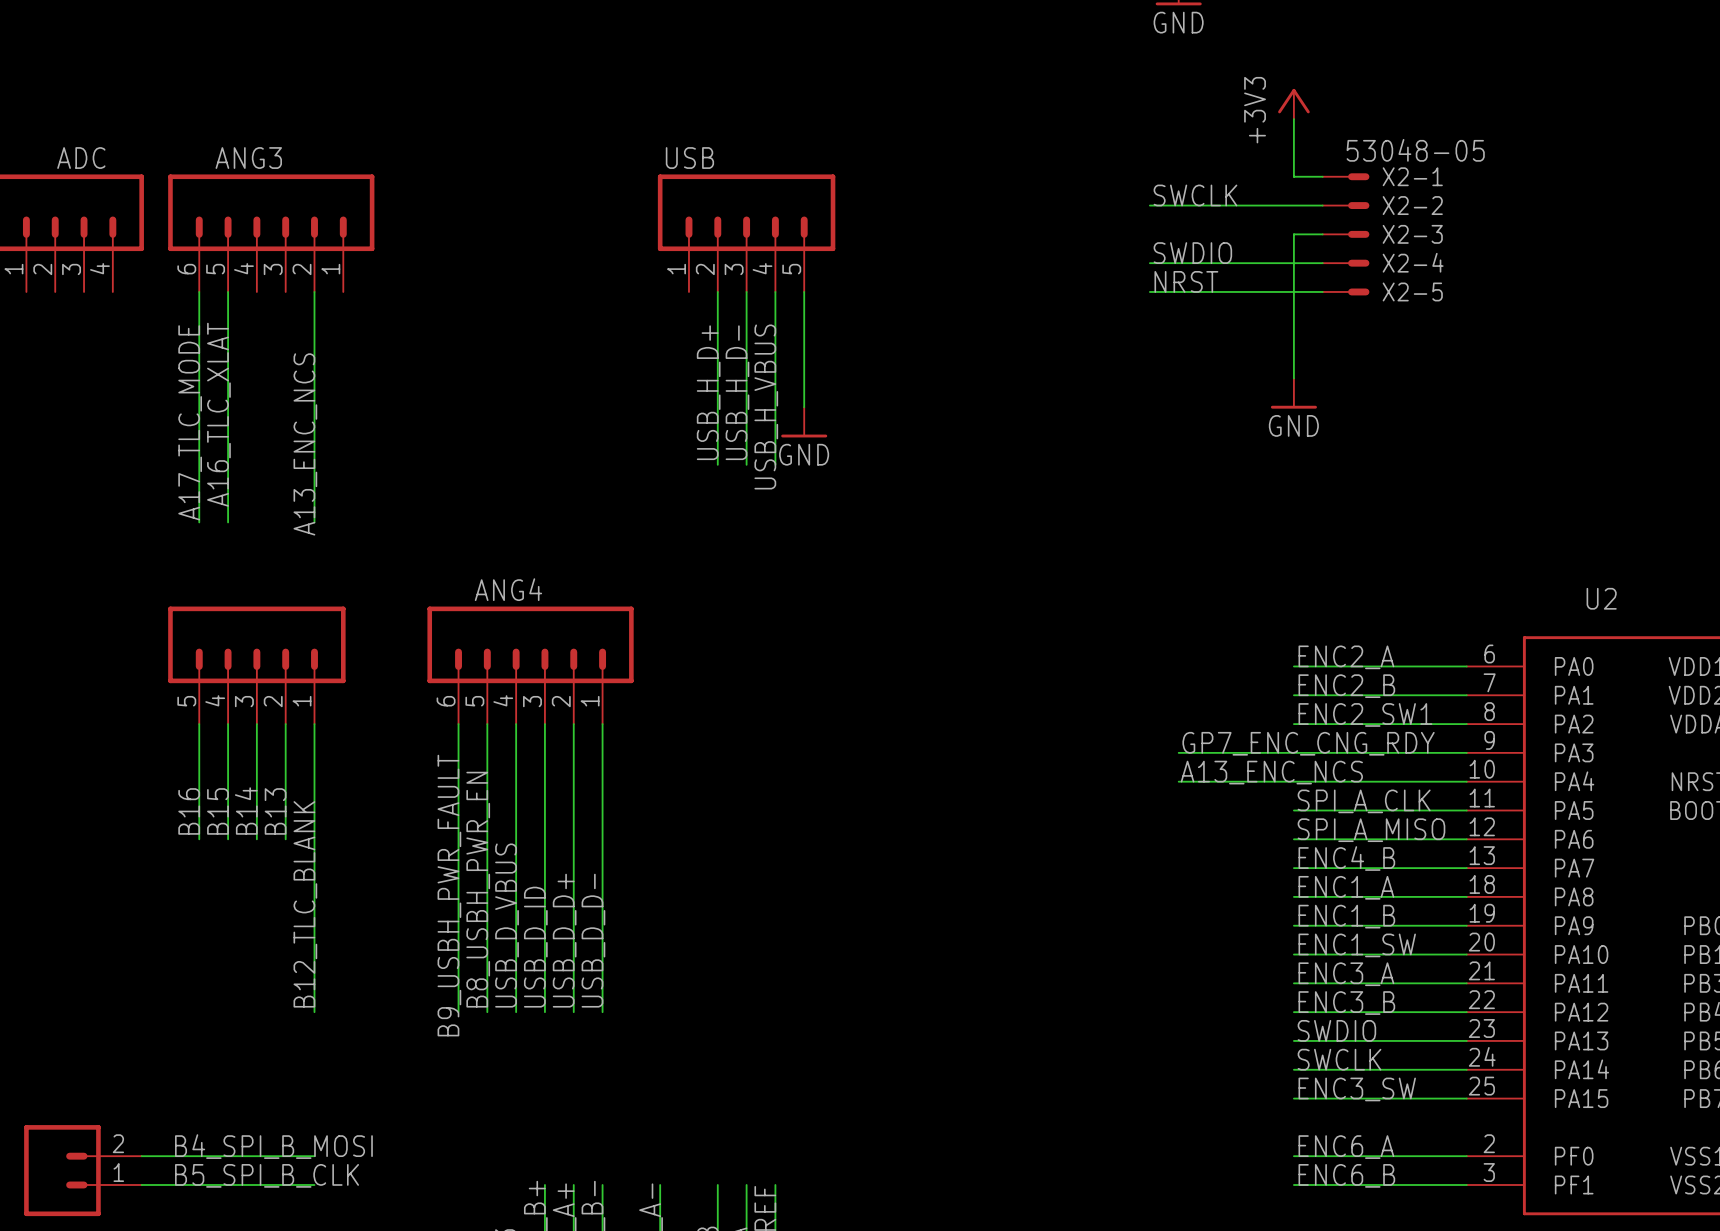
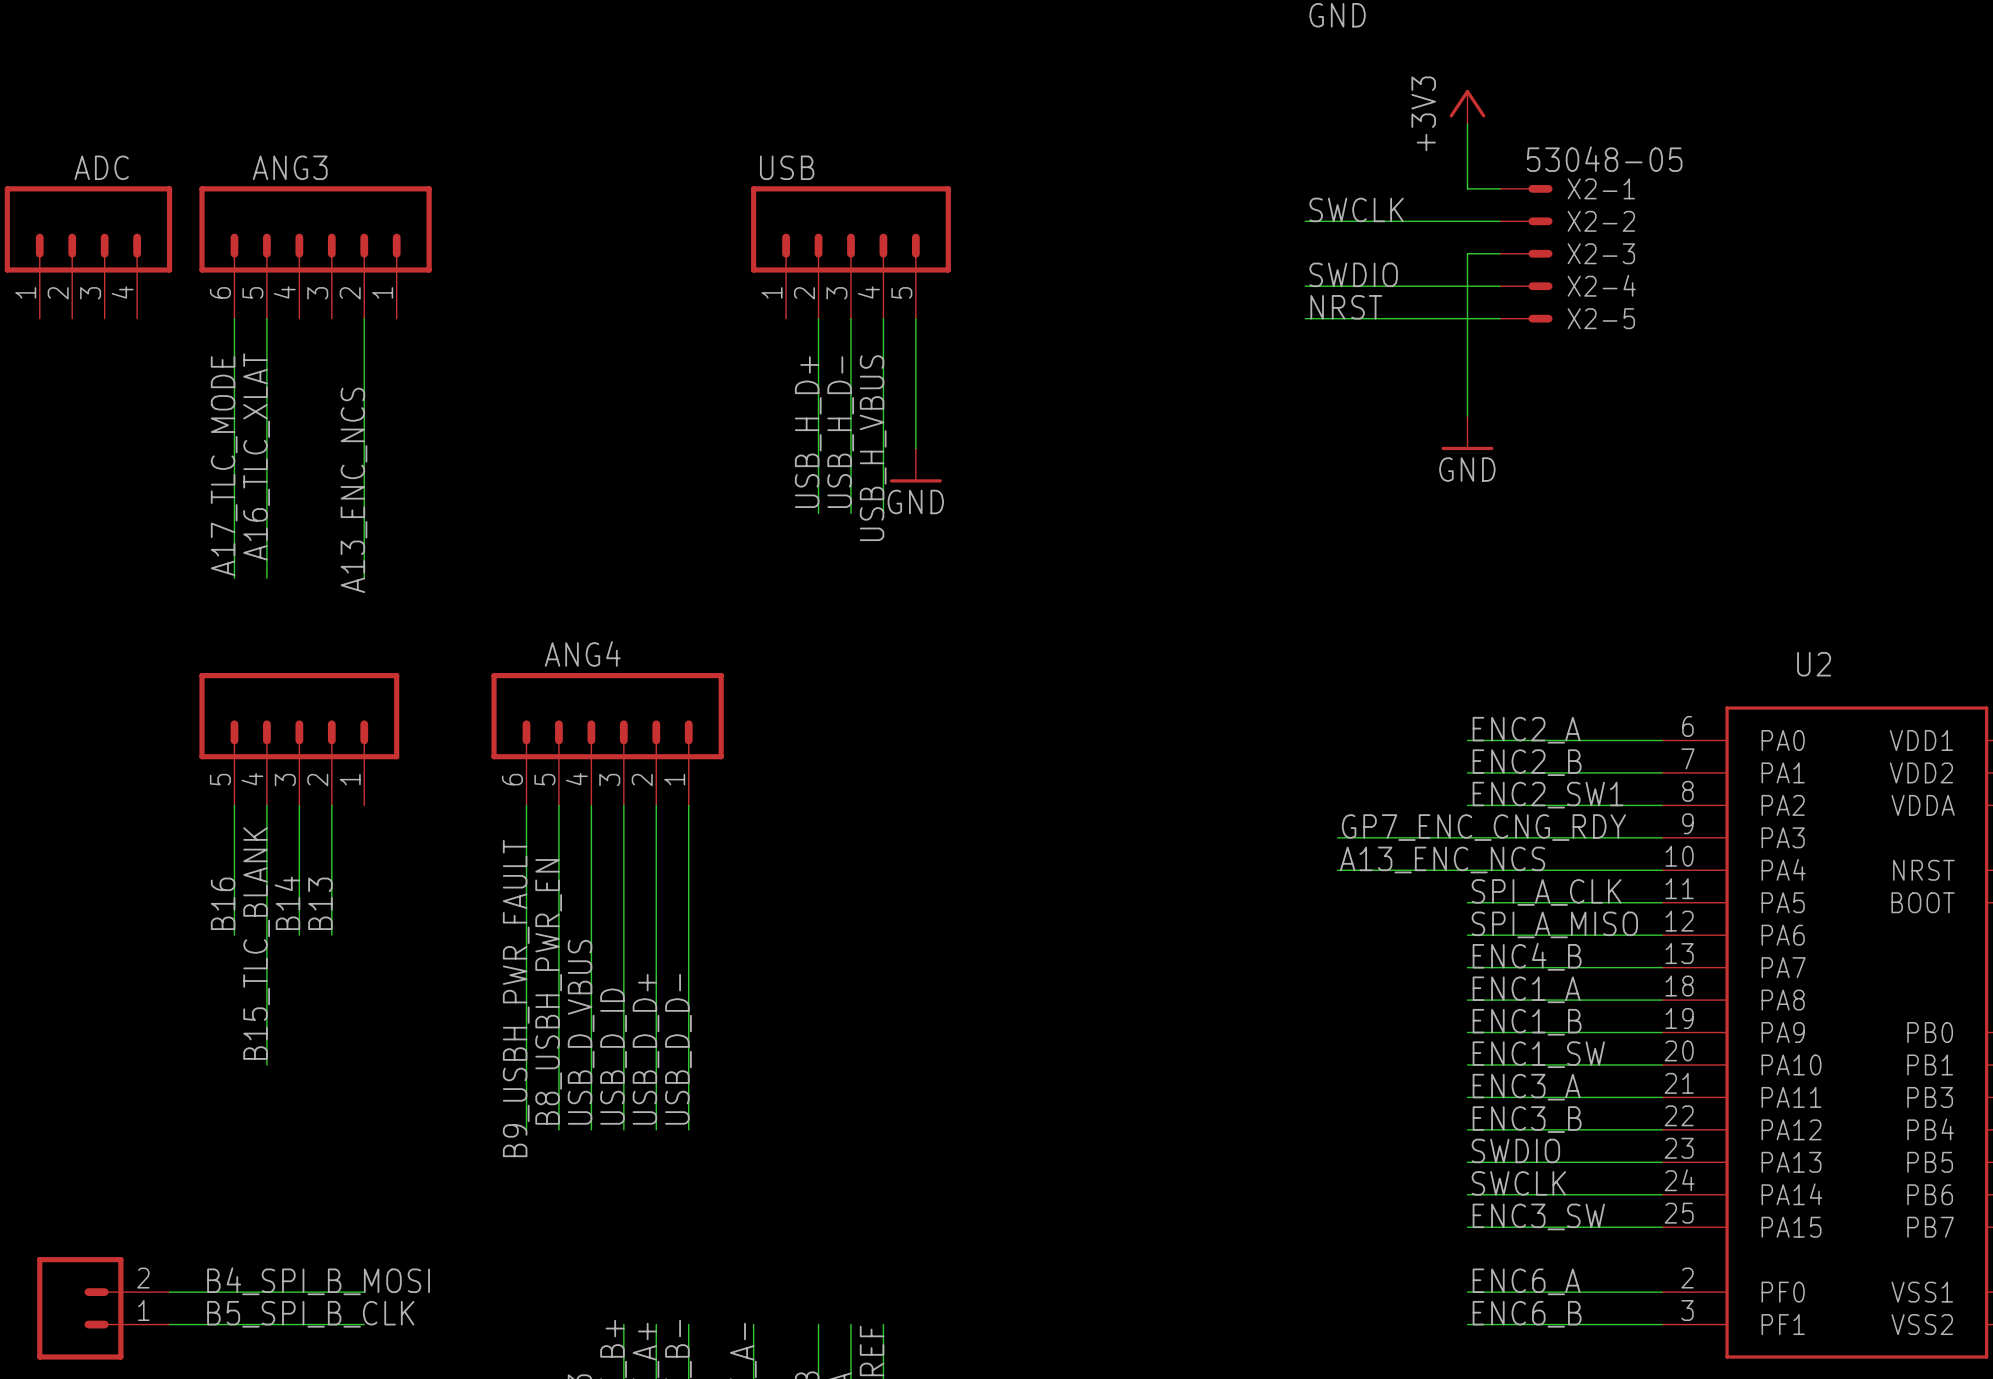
wire: (314, 724) (314, 1012) -> none
label: B15 (217, 811) -> none
wire: none -> (266, 935) (266, 1064)
label: none -> B15_TLC_BLANK (256, 943)
label: B12_TLC_BLANK (305, 904) -> none

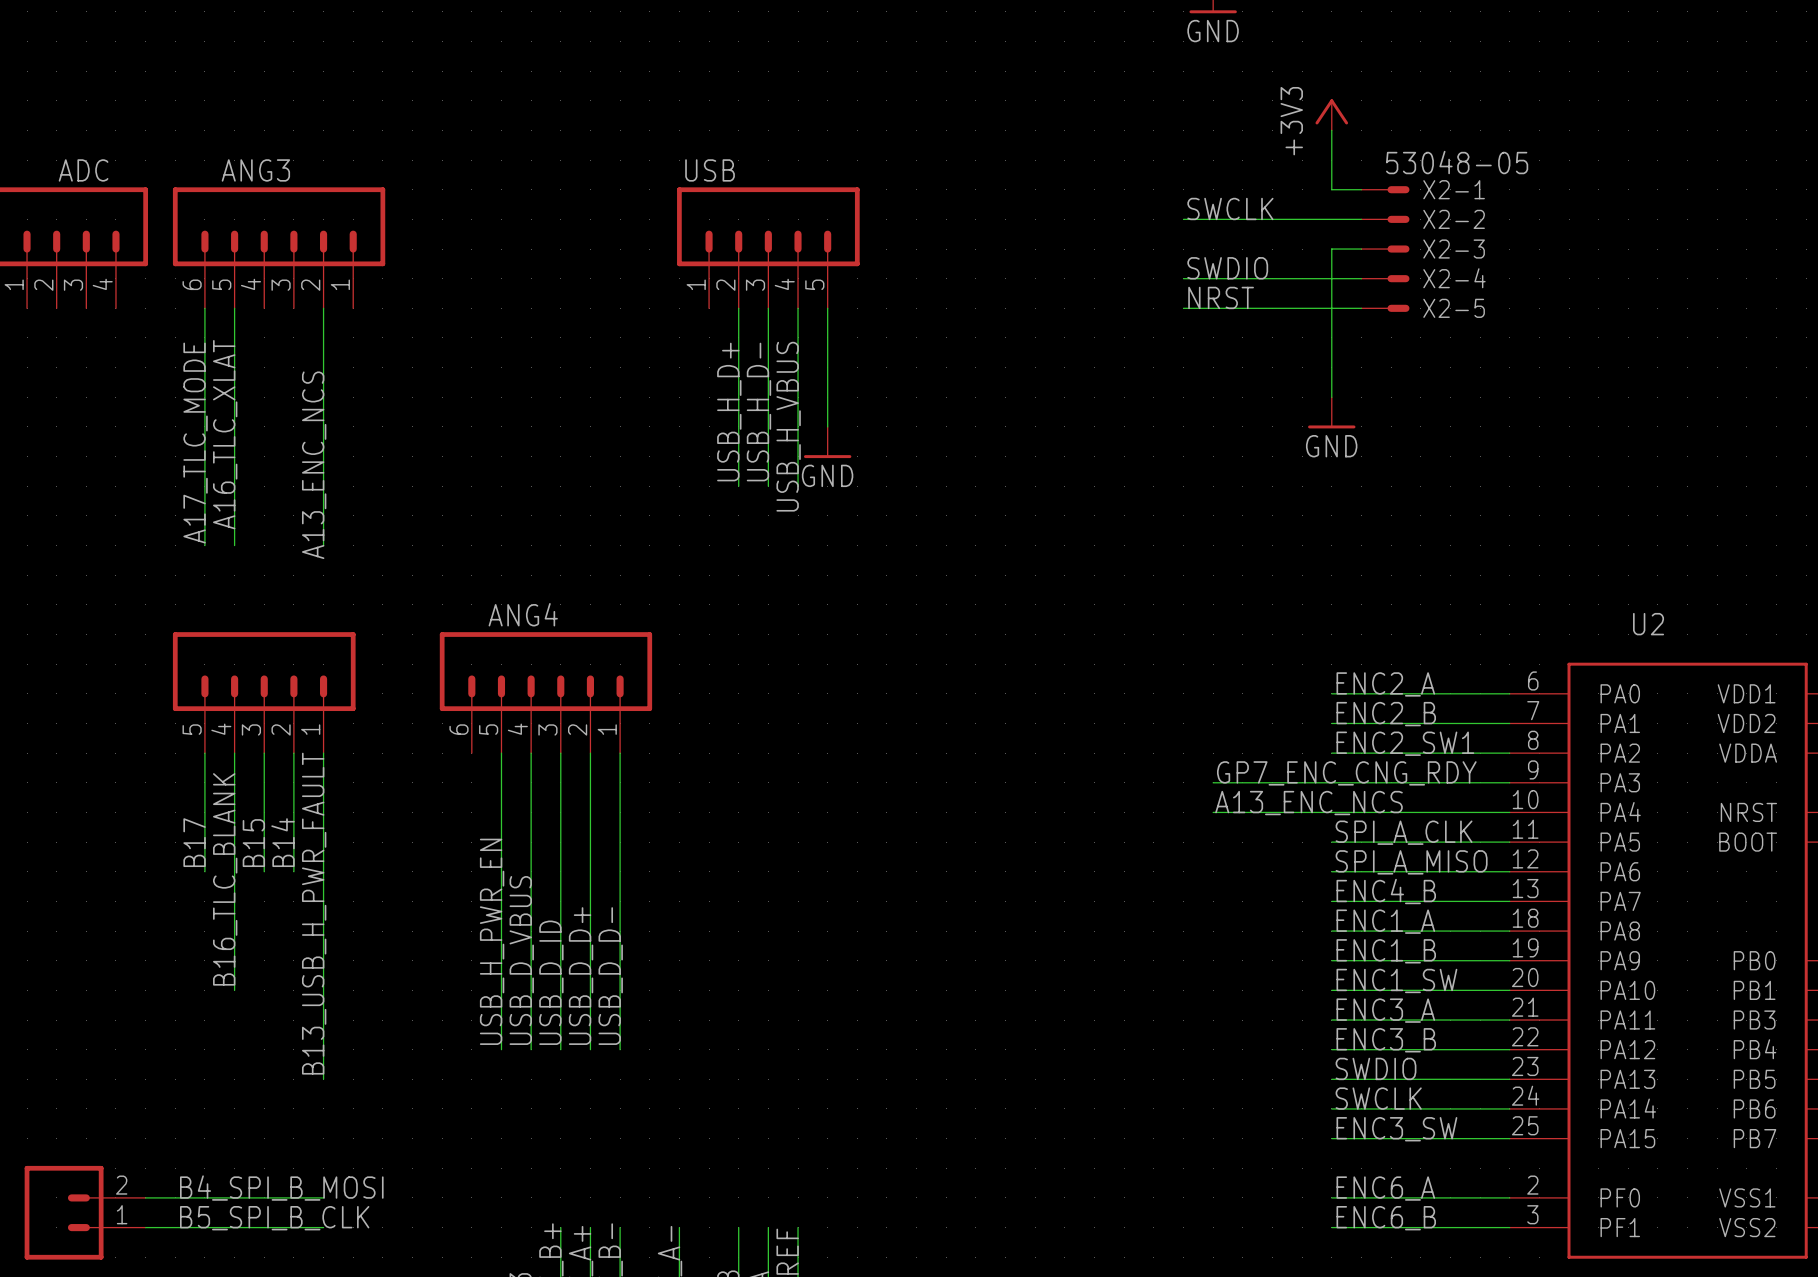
wire: none -> (323, 753) (323, 1079)
wire: (526, 805) (526, 1129) -> none
label: B16 (223, 903) -> B17 (194, 842)
label: B14 (287, 903) -> B15 (253, 843)
label: B13 (320, 903) -> B14 (283, 842)
label: B15_TLC_BLANK (256, 943) -> B16_TLC_BLANK (225, 879)
label: none -> B13_USB_H_PWR_FAULT (314, 913)
label: B8_USBH_PWR_EN (548, 991) -> USB_H_PWR_EN (492, 941)
label: B9_USBH_PWR_FAULT (516, 998) -> none

